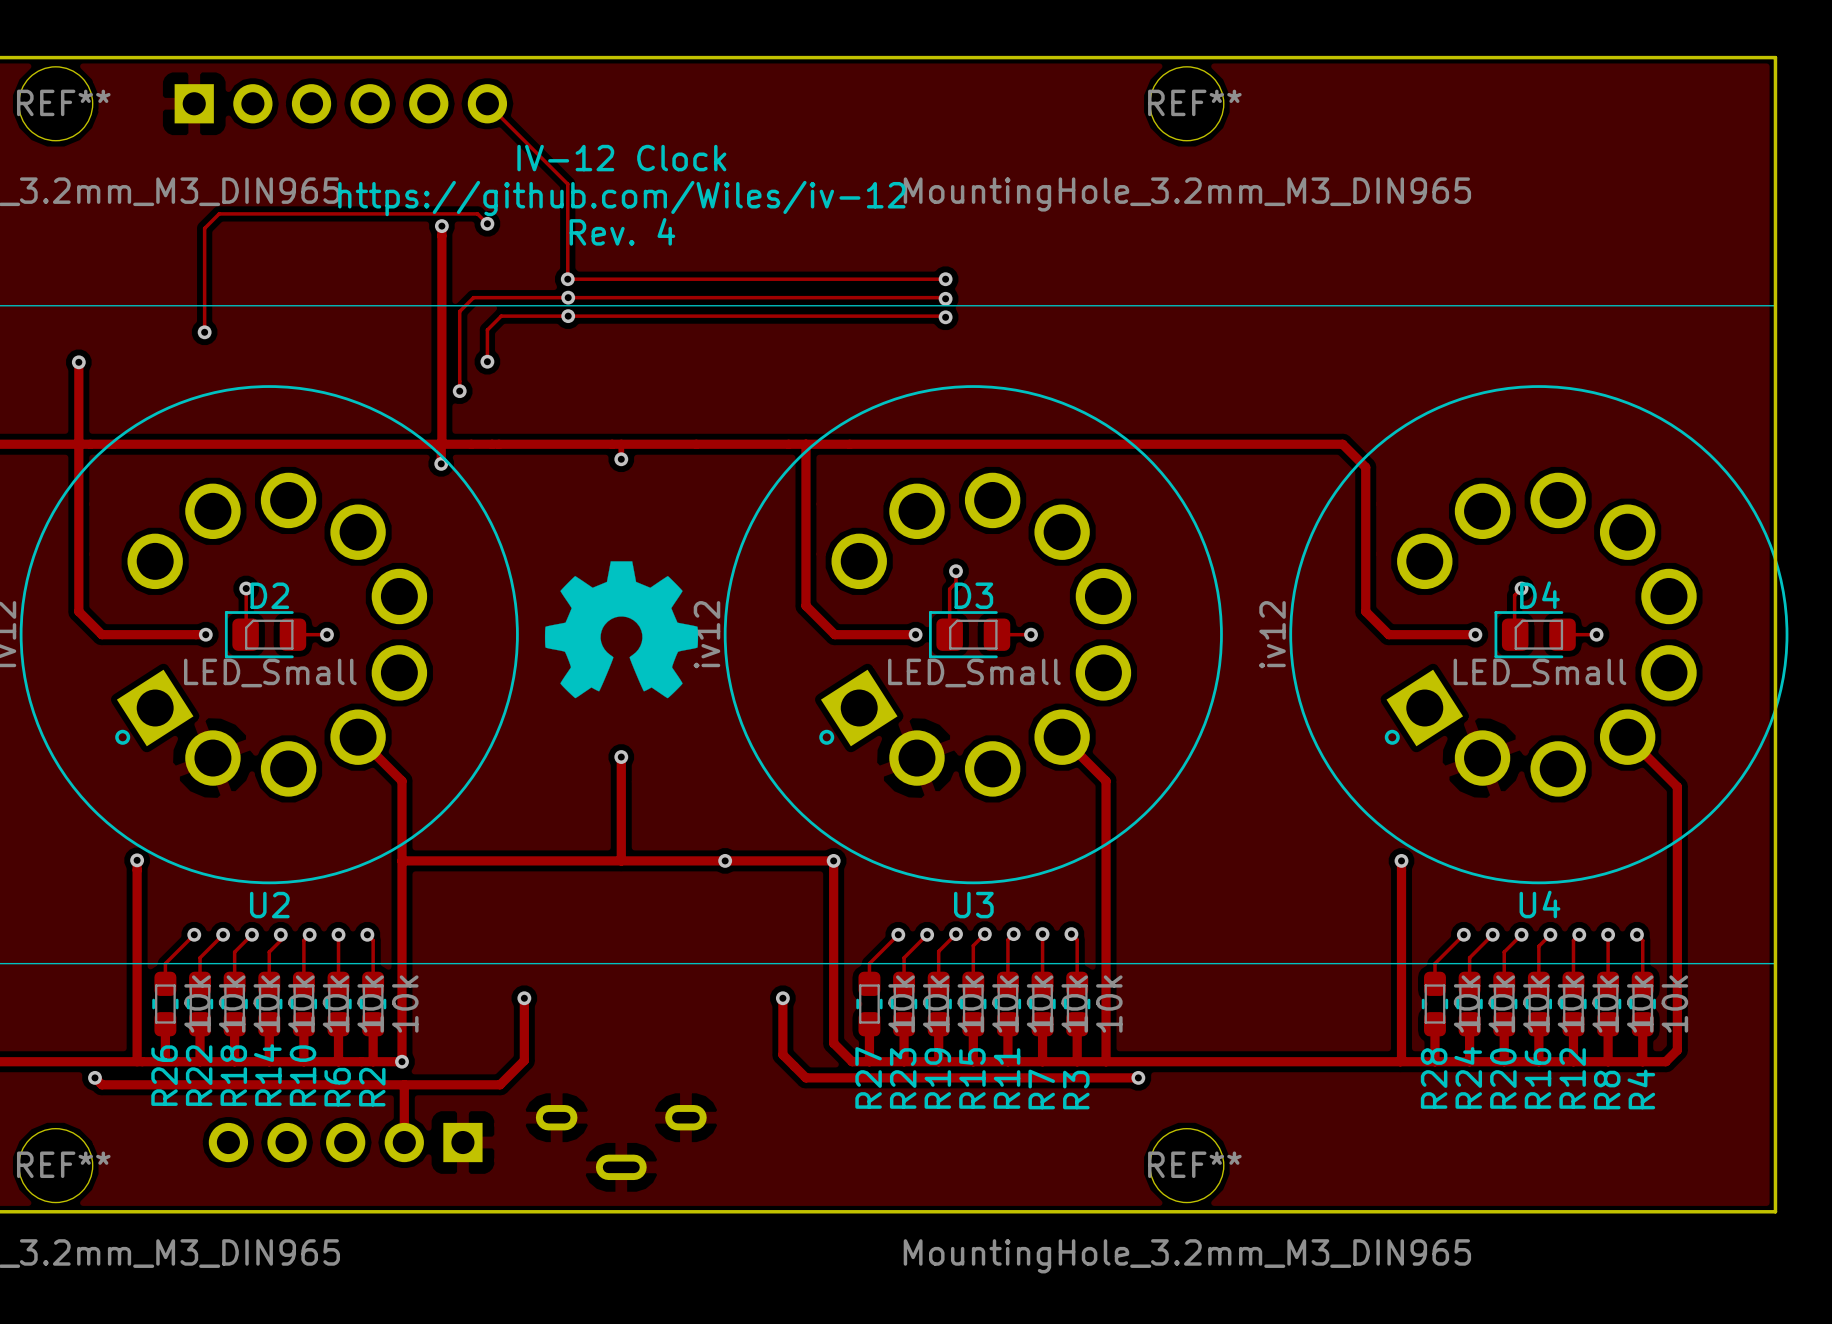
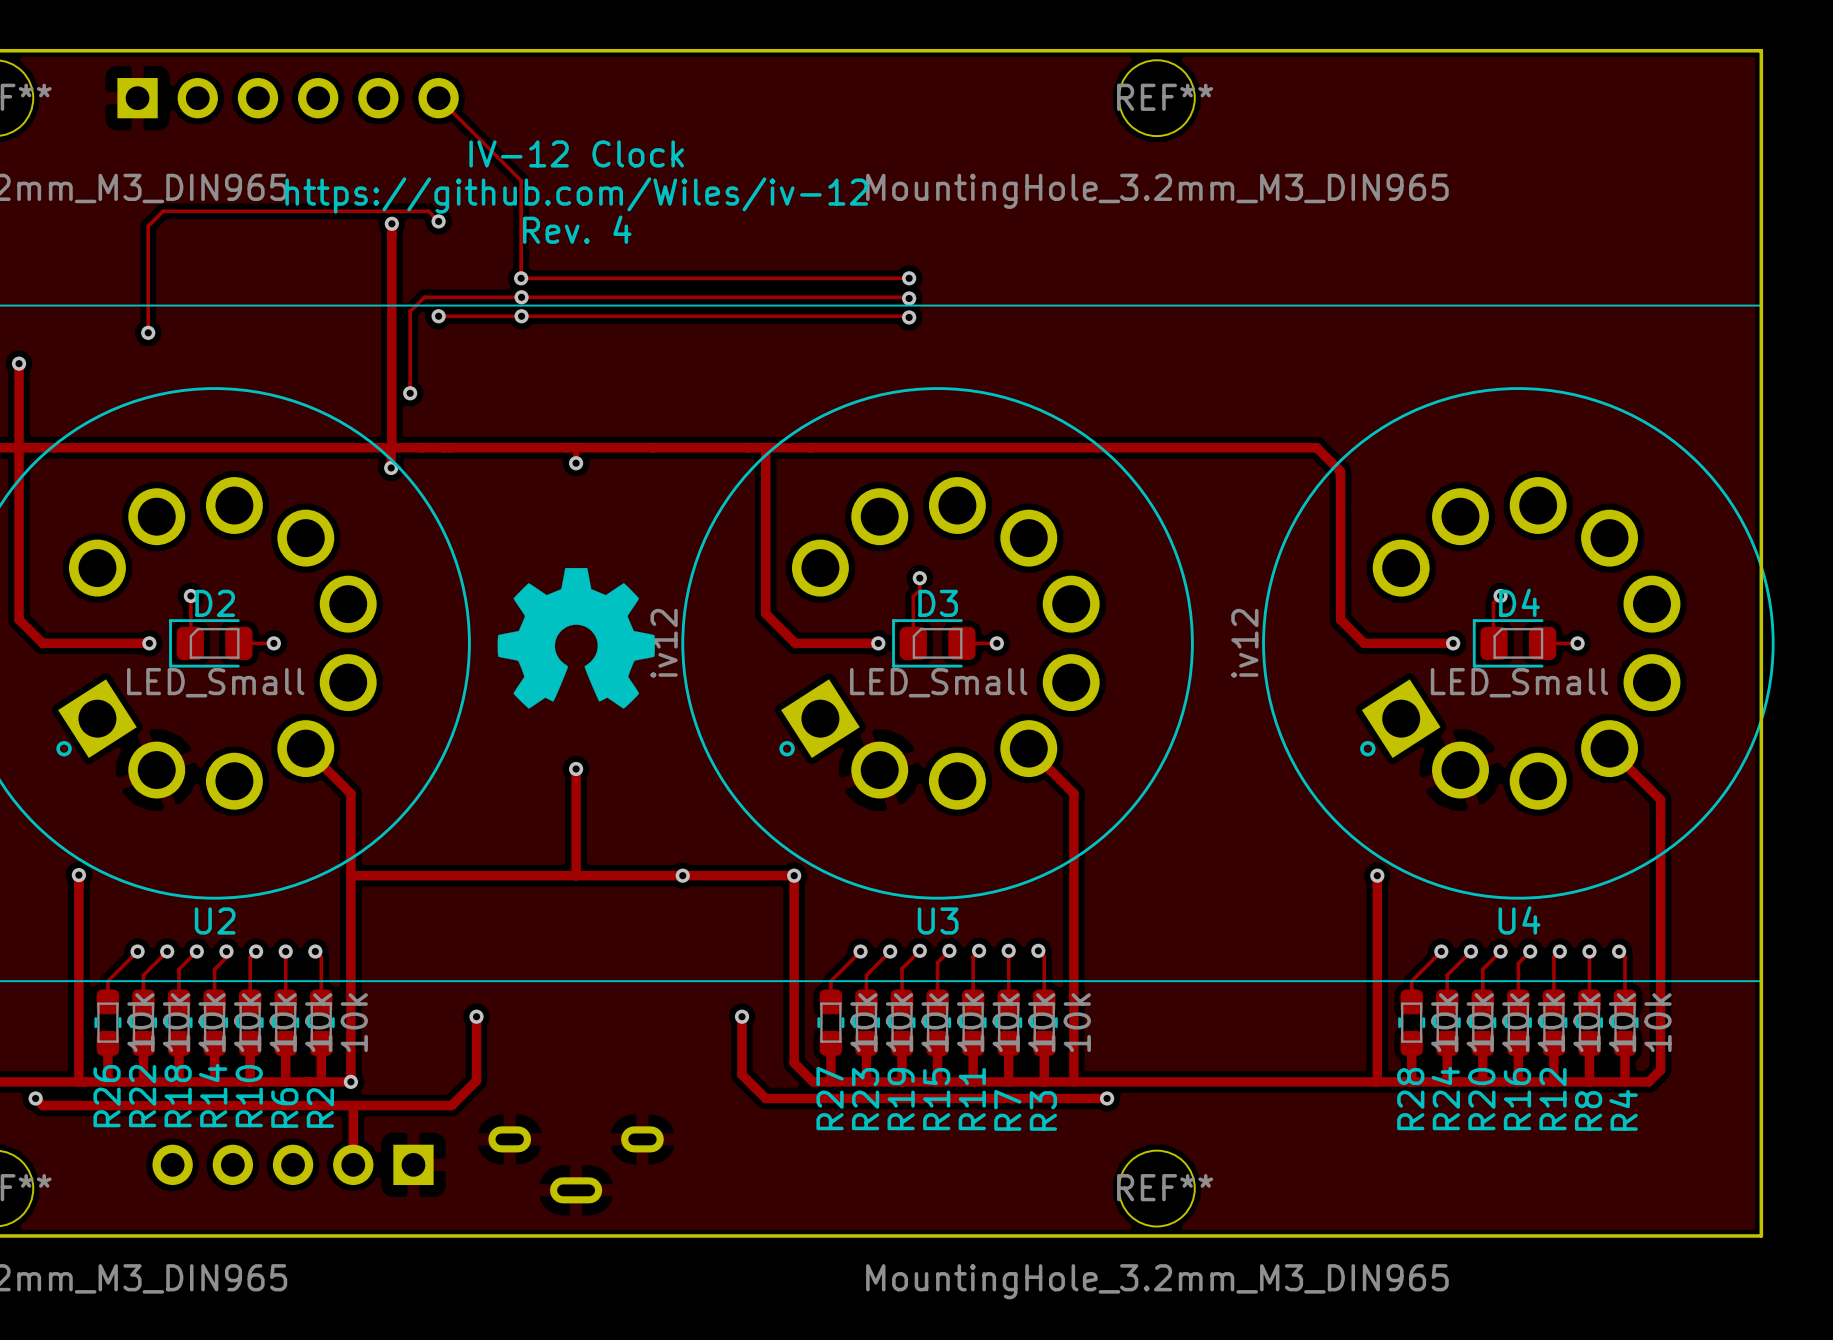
track: (501, 316) (487, 329) (487, 361) -> (452, 316) (438, 316)
via position: (487, 361) -> (438, 316)

